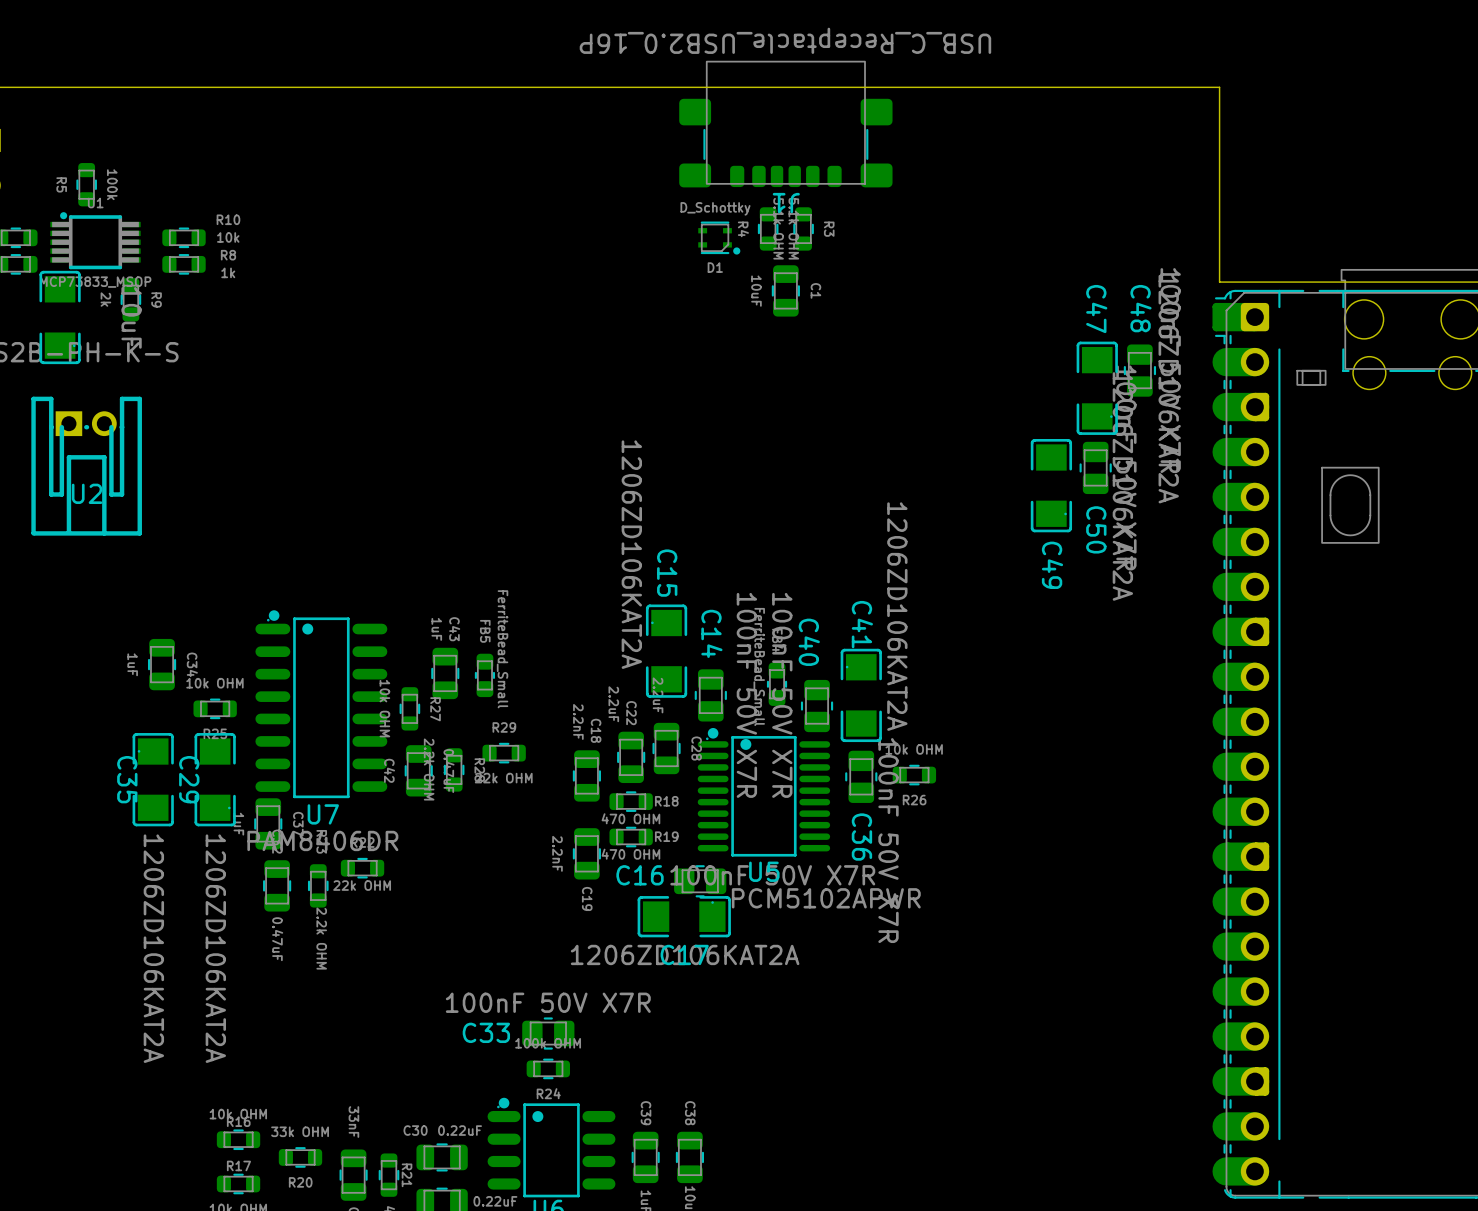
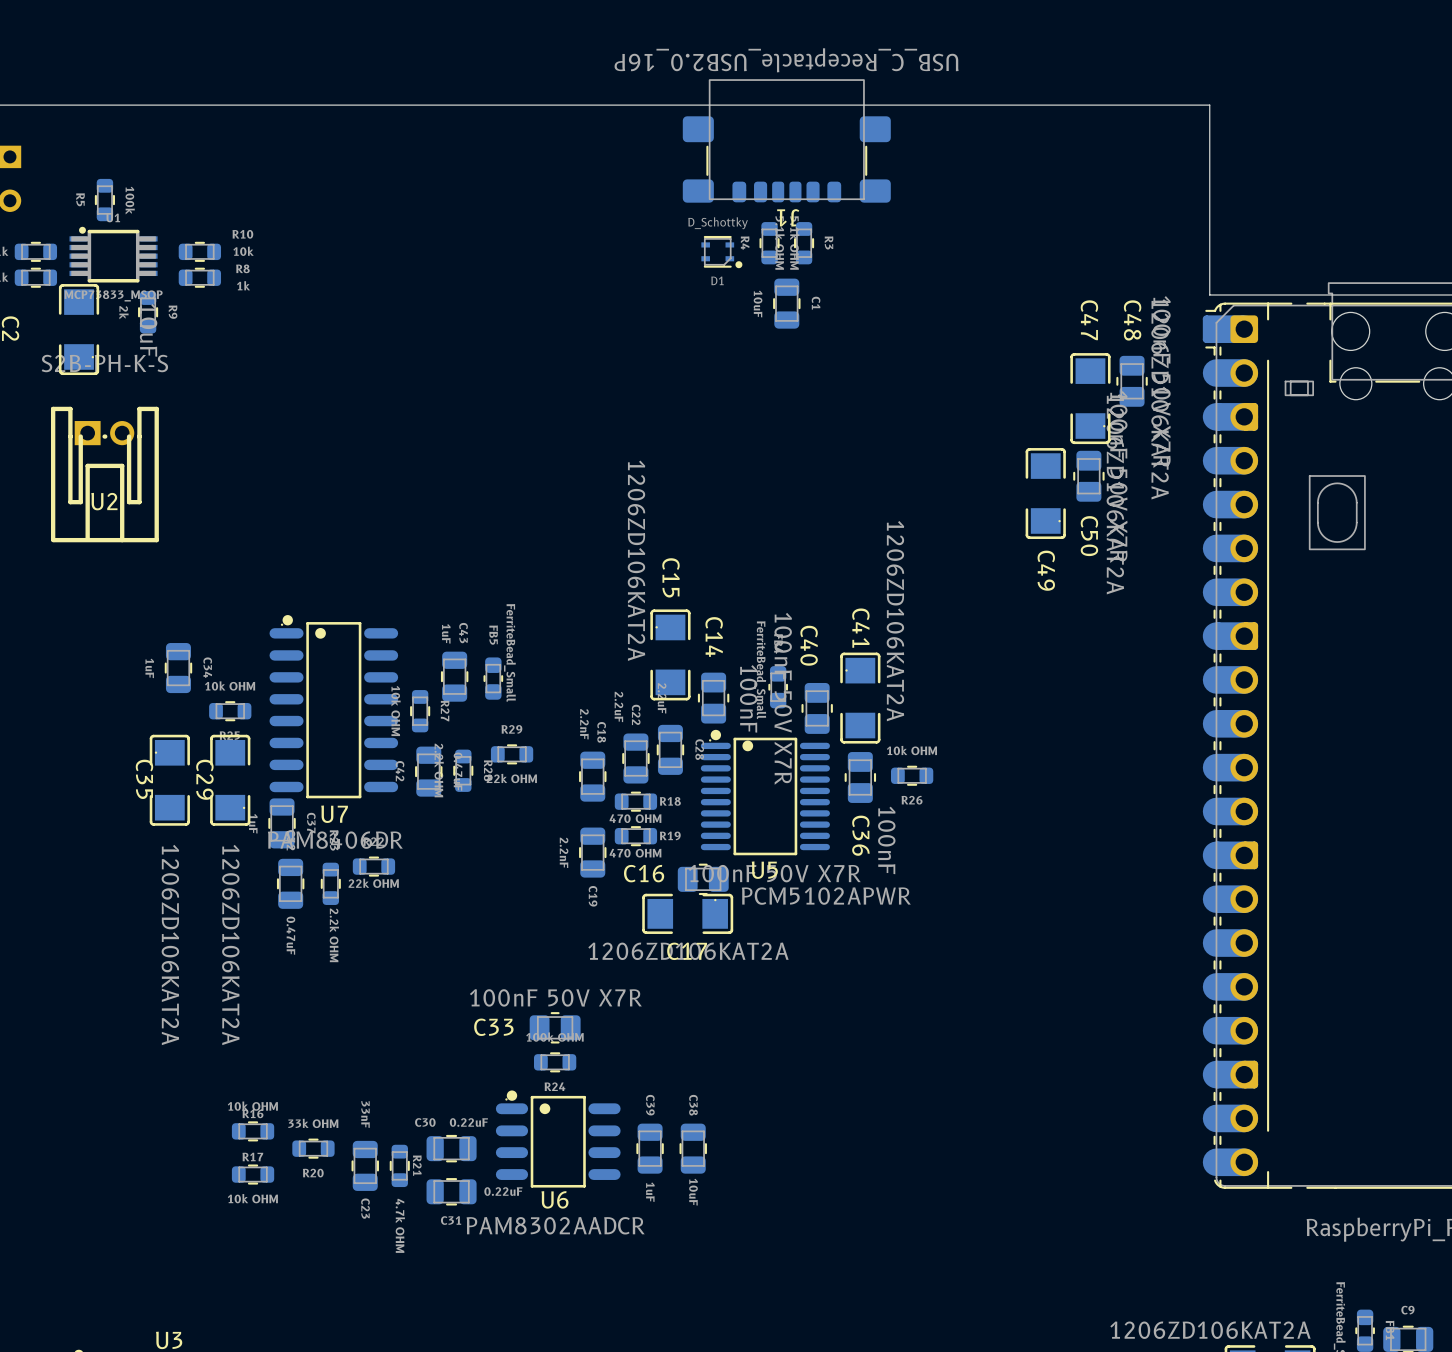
C14 value: 100nF 50V X7R (746, 695) -> 100nF (748, 698)
C36 value: 100nF 50V X7R (888, 840) -> 100nF (886, 840)

